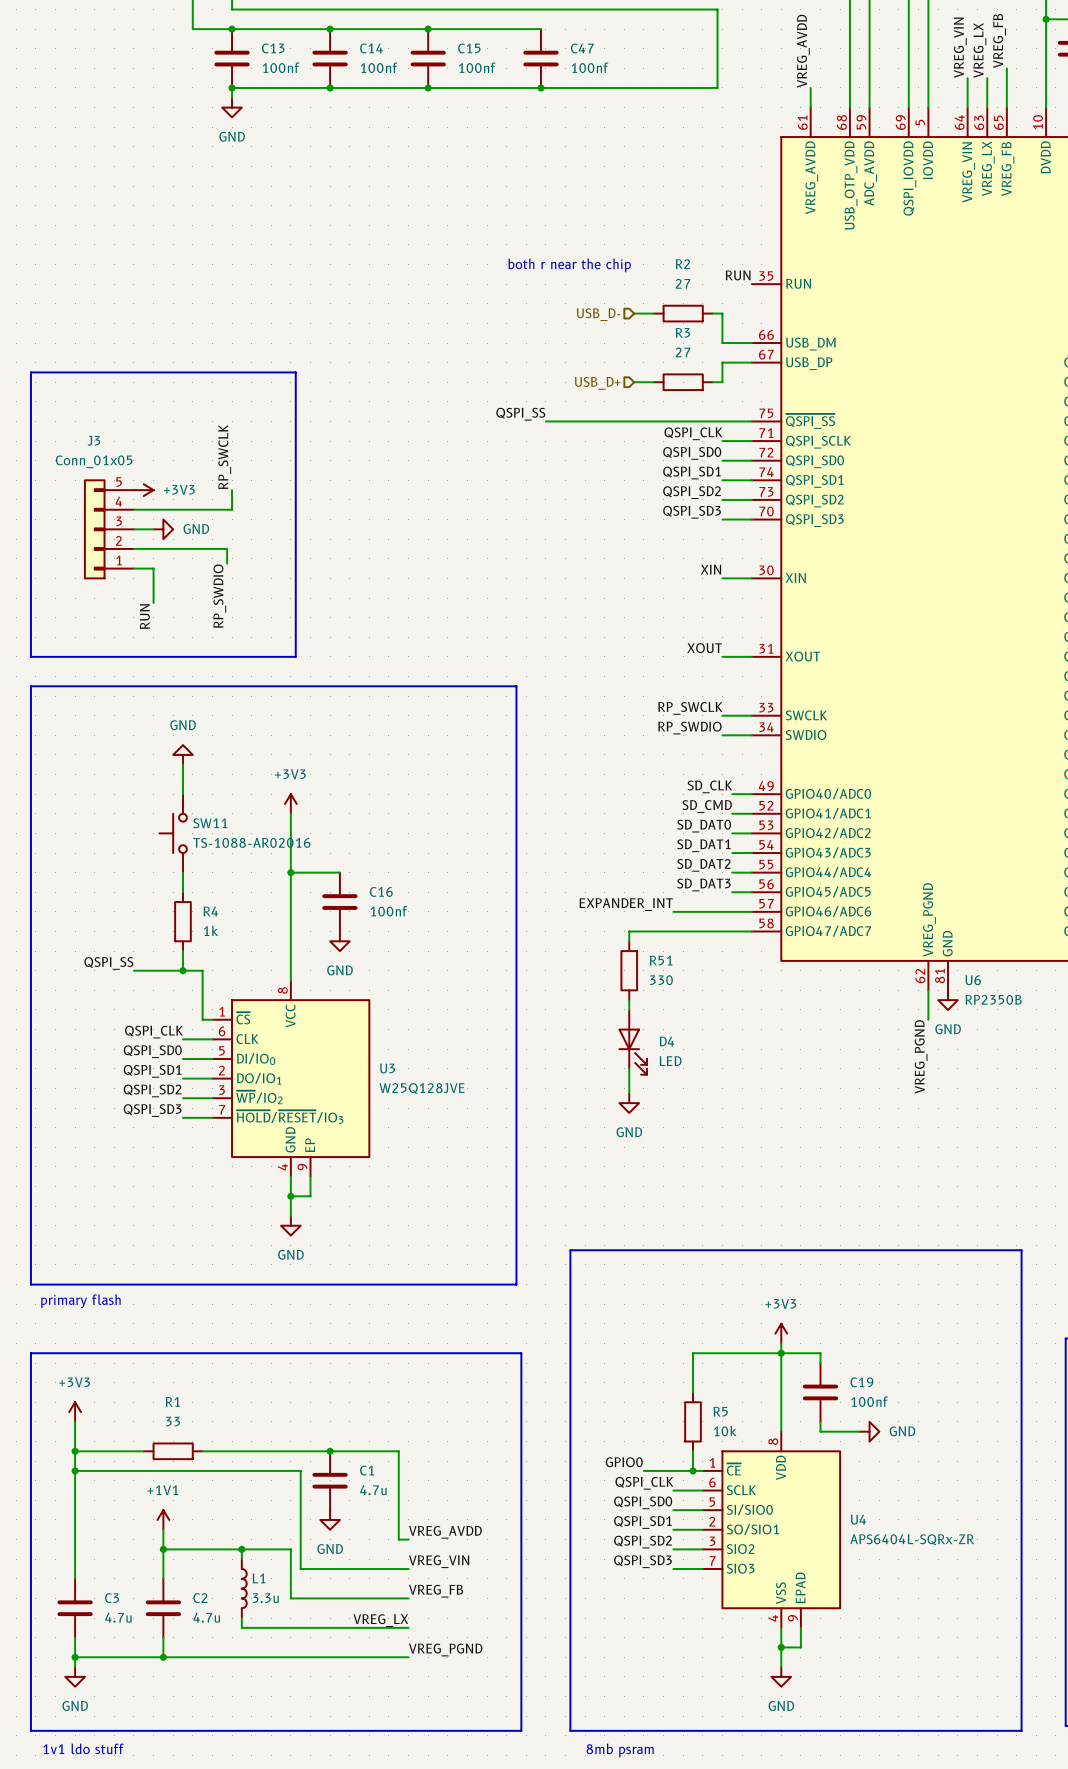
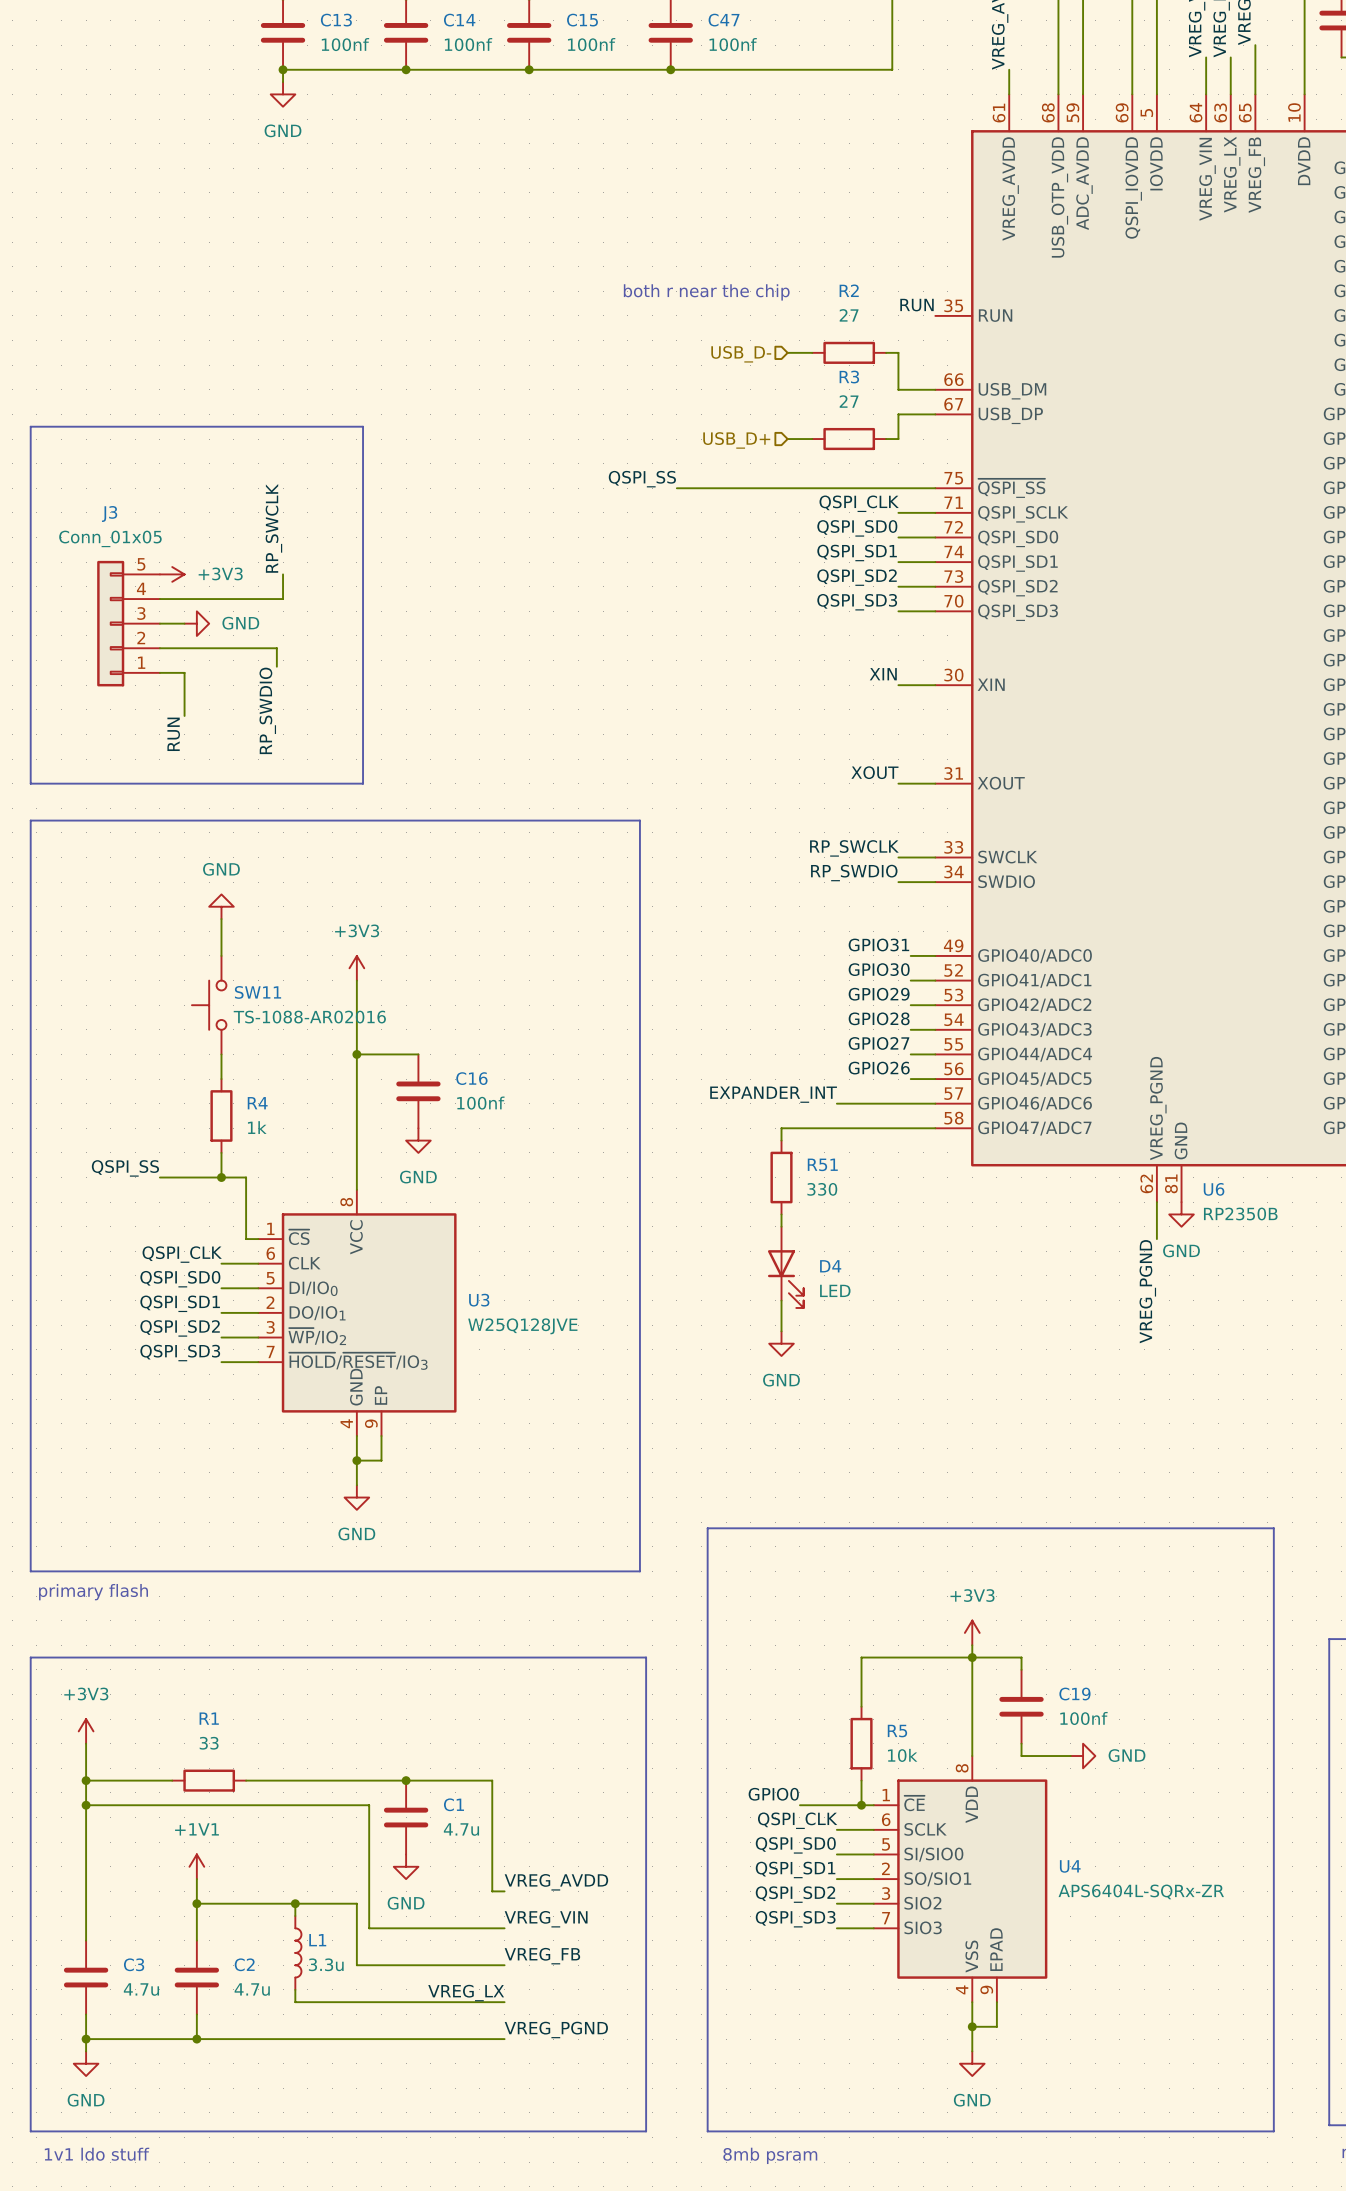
label: SD_CLK (709, 786) -> GPIO31 (878, 944)
label: SD_CMD (707, 806) -> GPIO30 (879, 969)
label: SD_DAT0 (704, 826) -> GPIO29 (879, 994)
label: SD_DAT1 (703, 845) -> GPIO28 (879, 1018)
label: SD_DAT2 (703, 865) -> GPIO27 (878, 1043)
label: SD_DAT3 (703, 884) -> GPIO26 (879, 1068)

